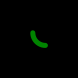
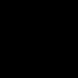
bottom track: (32, 32) (36, 41) (45, 45) -> none

